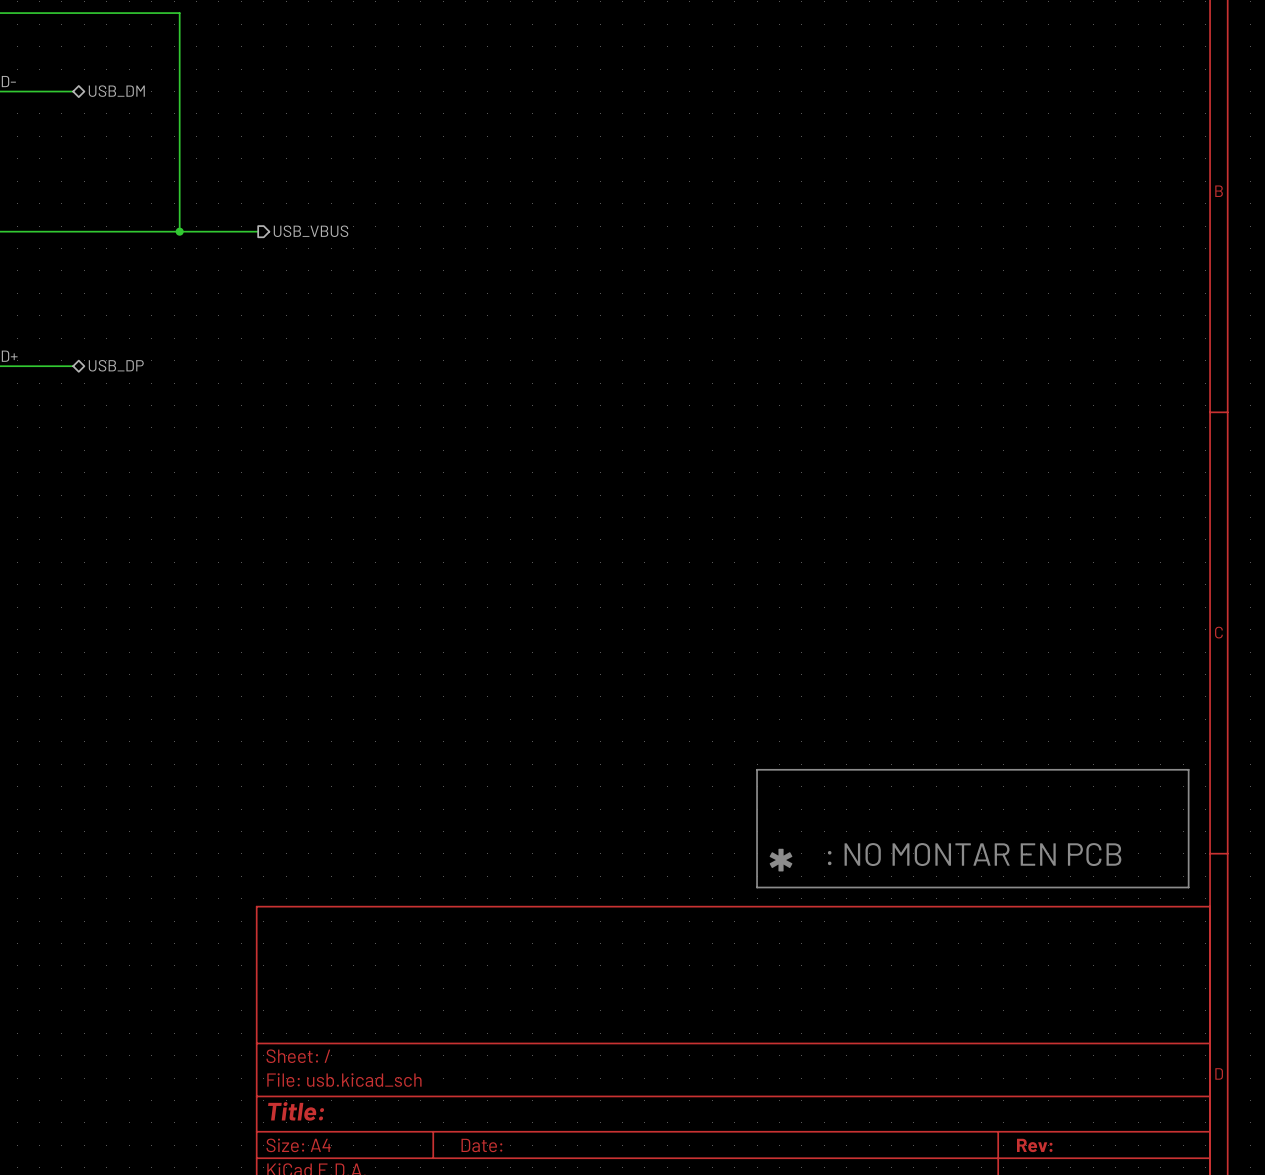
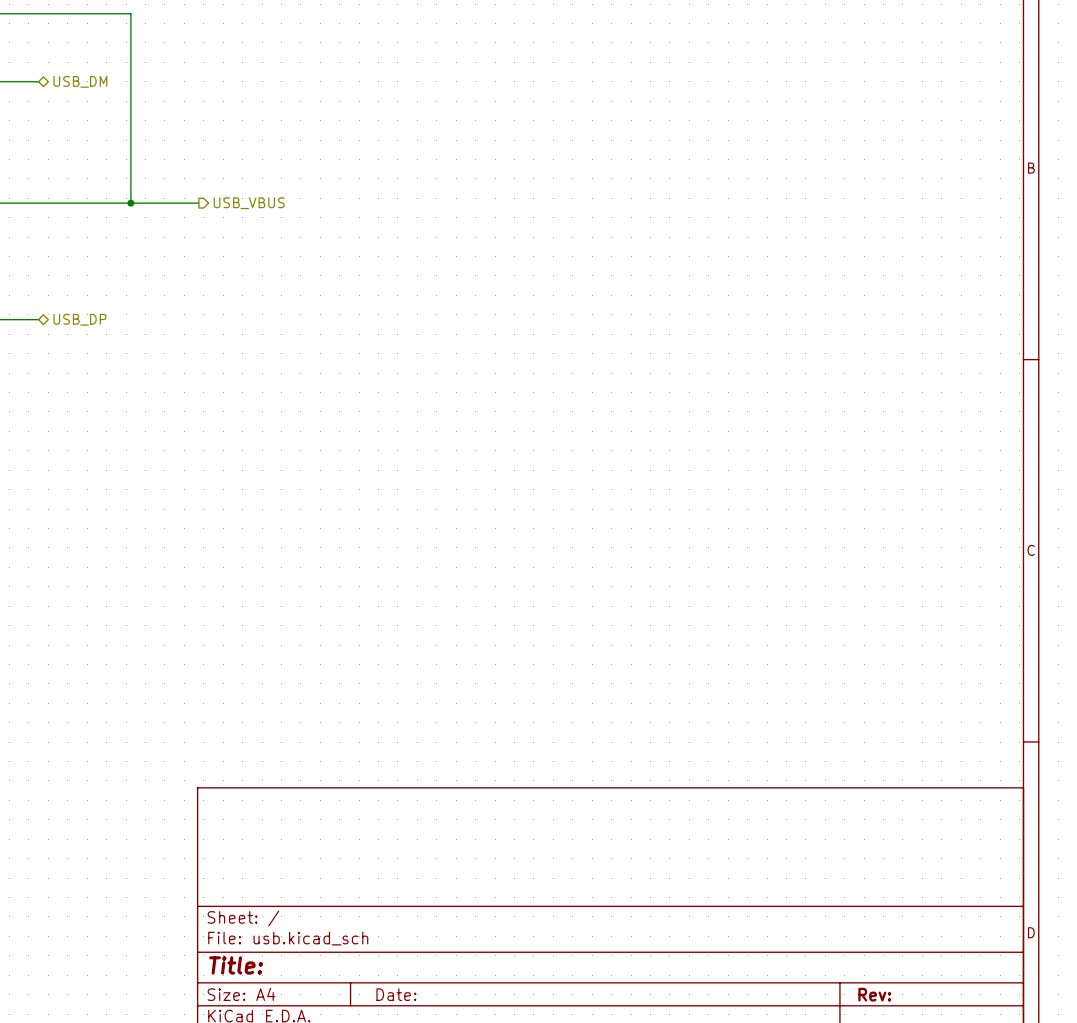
line: (757, 769) (757, 887) (1188, 887) (1188, 769) (757, 769) -> none
text: : NO MONTAR EN PCB (974, 854) -> none
text: * (781, 860) -> none

